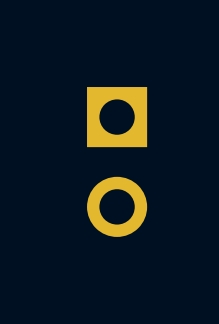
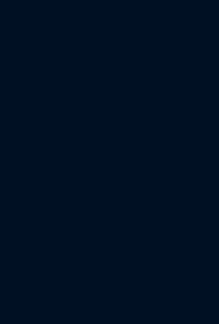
part: (117, 161) -> none

